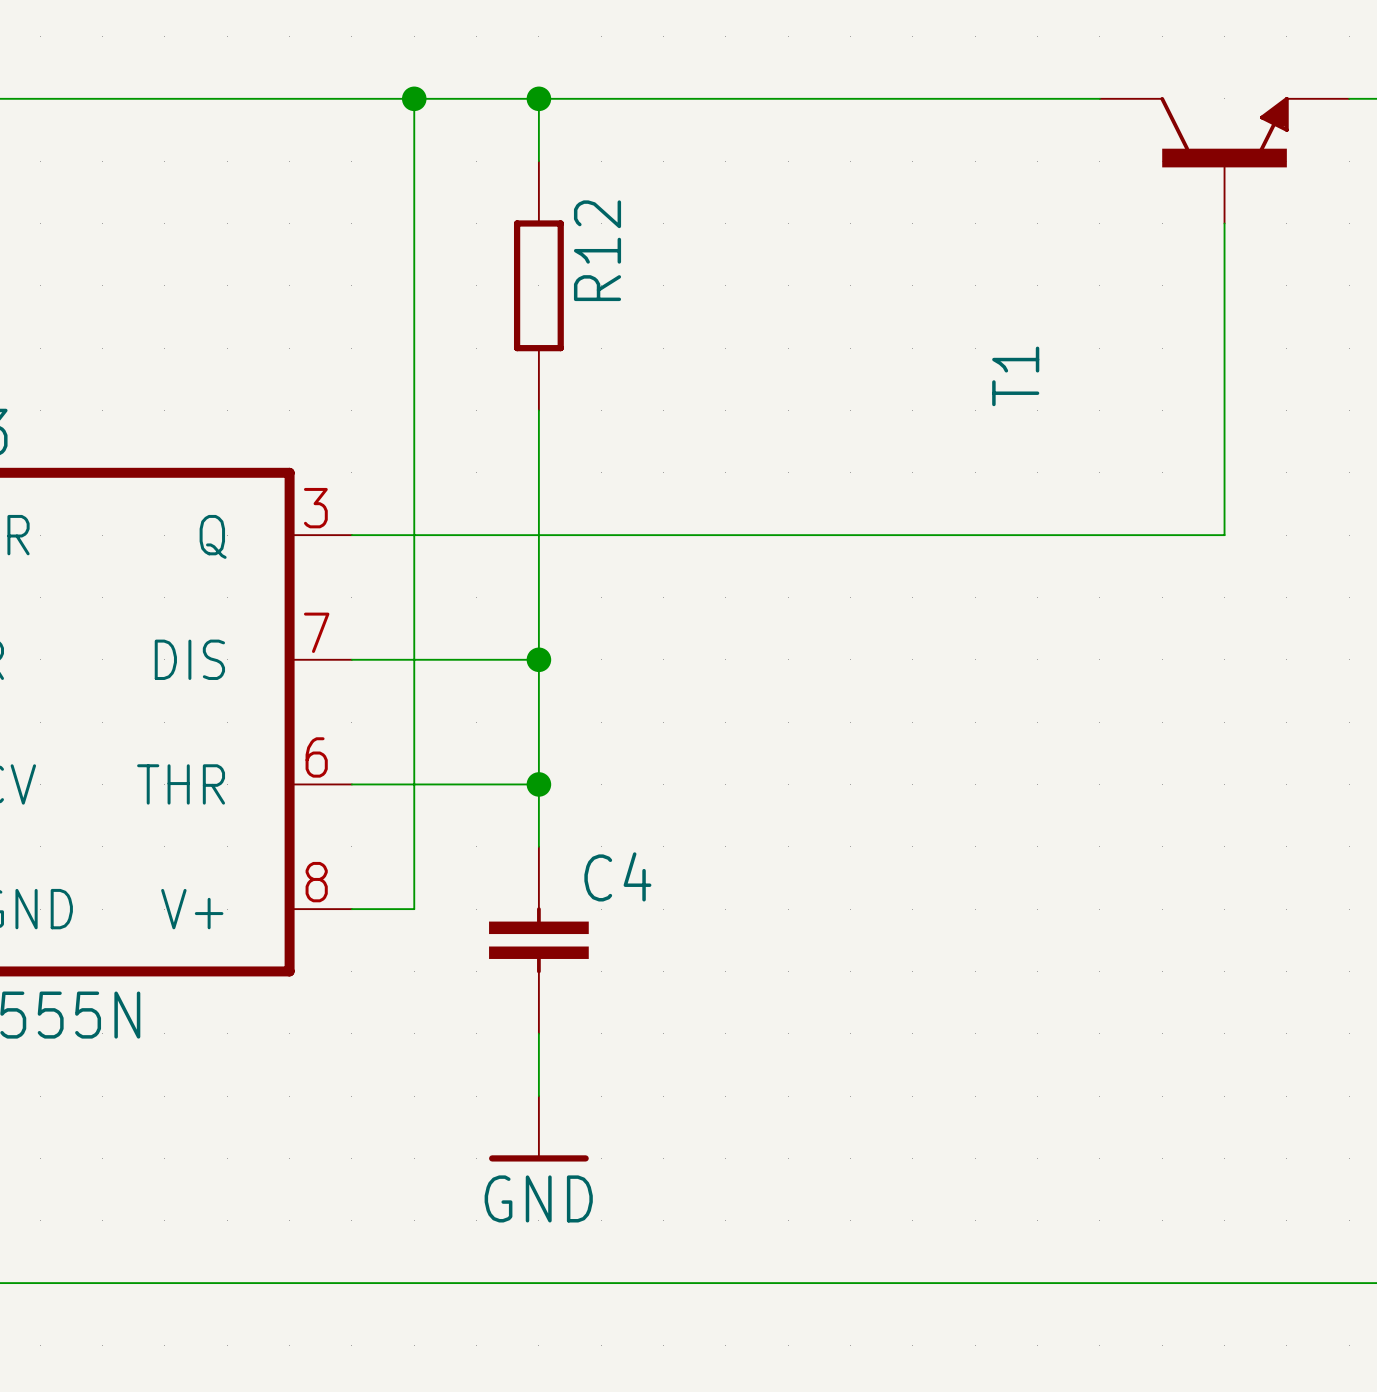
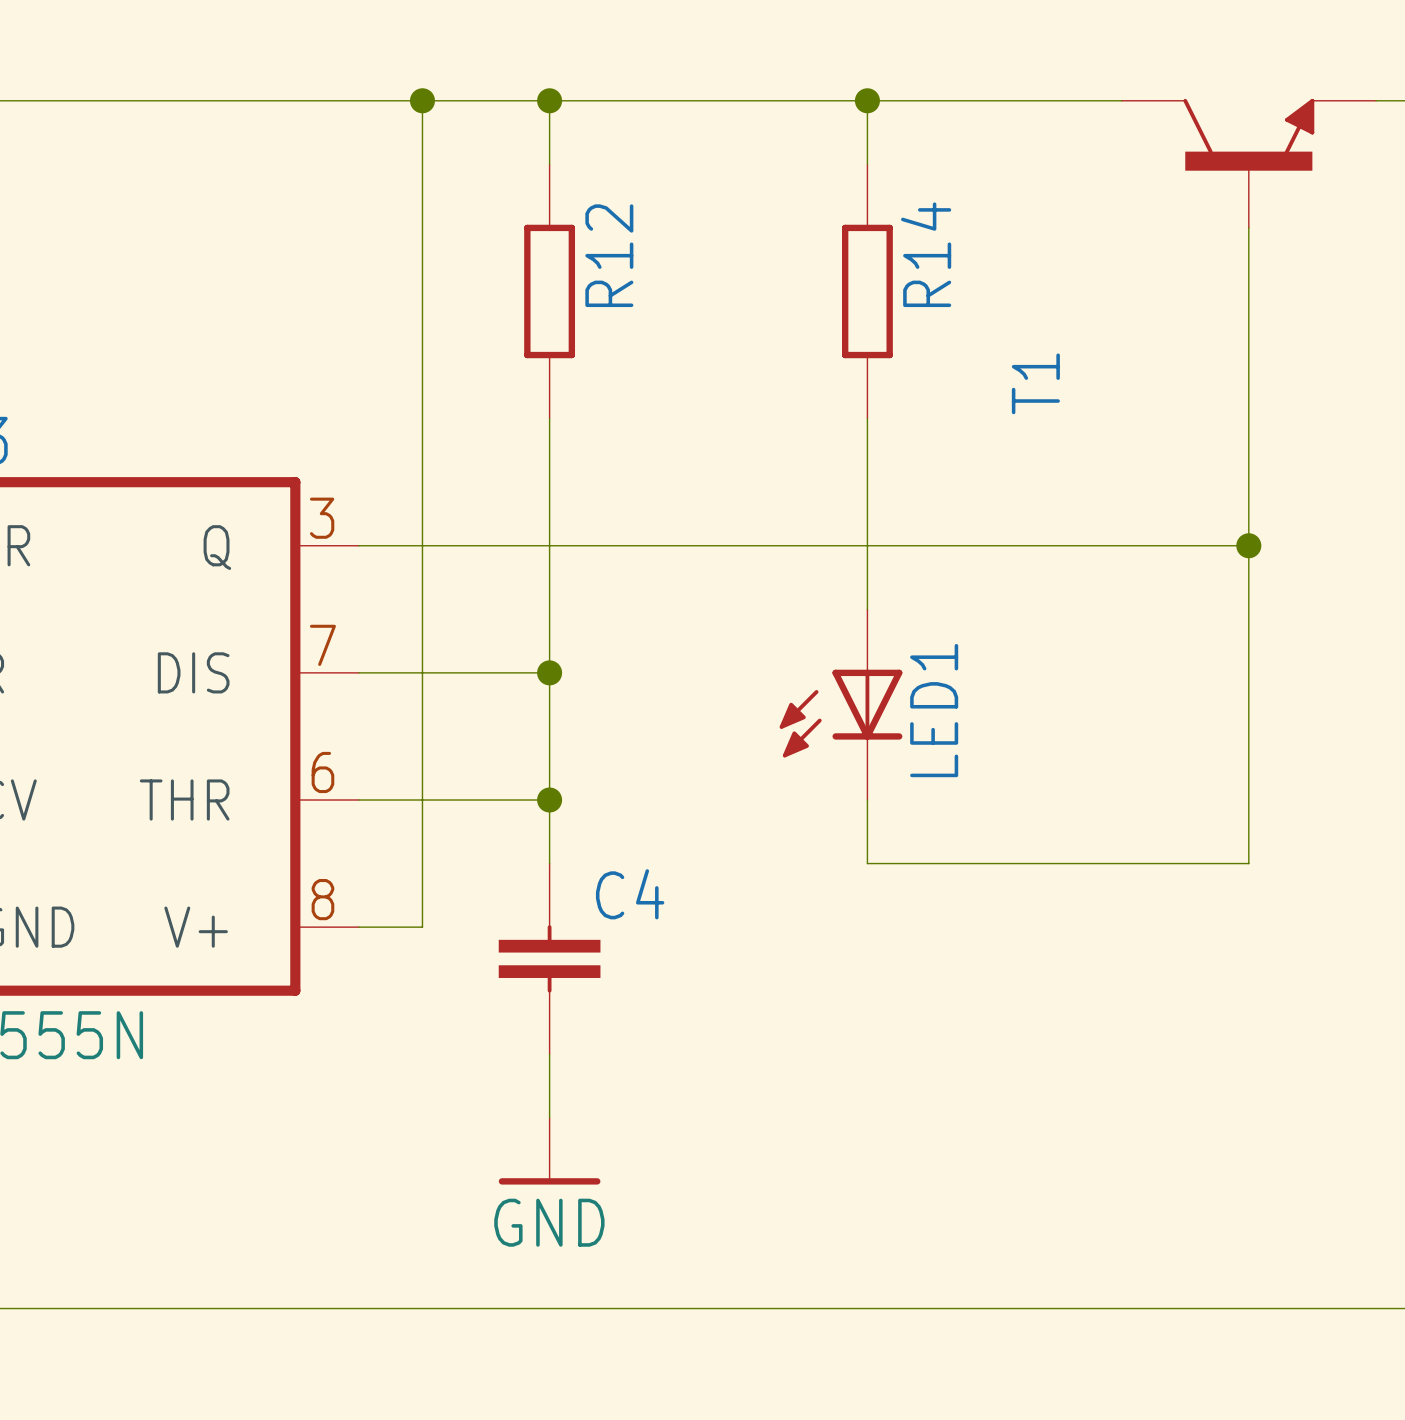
wire: none -> (867, 100) (867, 164)
junction: none -> (867, 100)
R14: none -> (867, 291)
wire: none -> (867, 418) (867, 609)
wire: none -> (1248, 545) (1248, 863) (867, 863) (867, 800)
junction: none -> (1248, 545)
LED1: none -> (841, 704)

